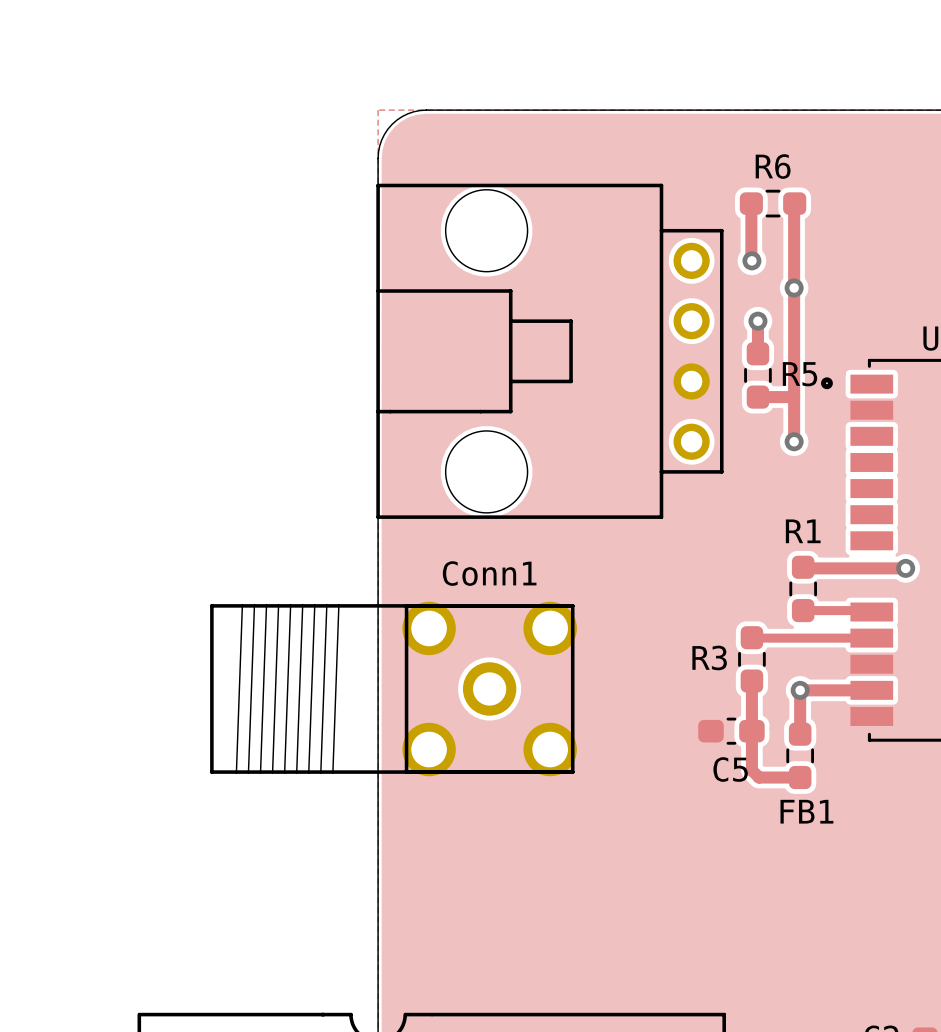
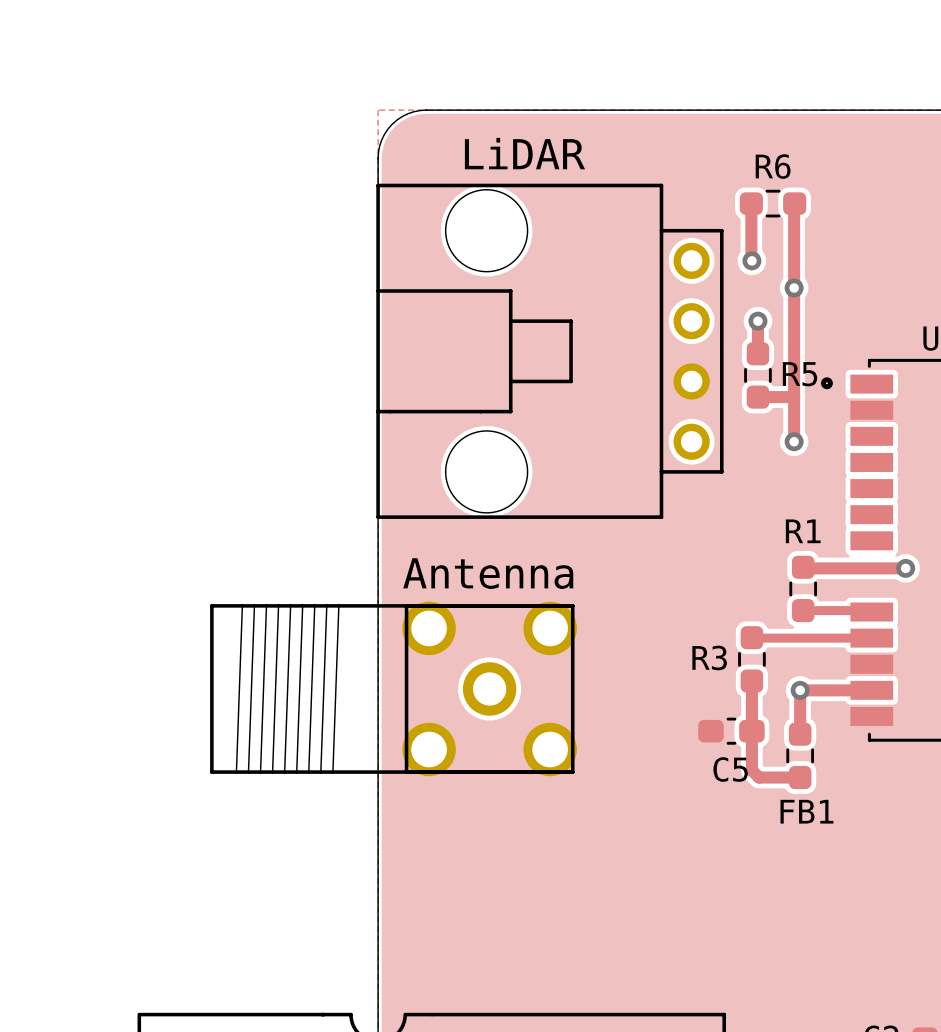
text: none -> LiDAR (524, 153)
Conn1 name: Conn1 (489, 573) -> Antenna (488, 573)

